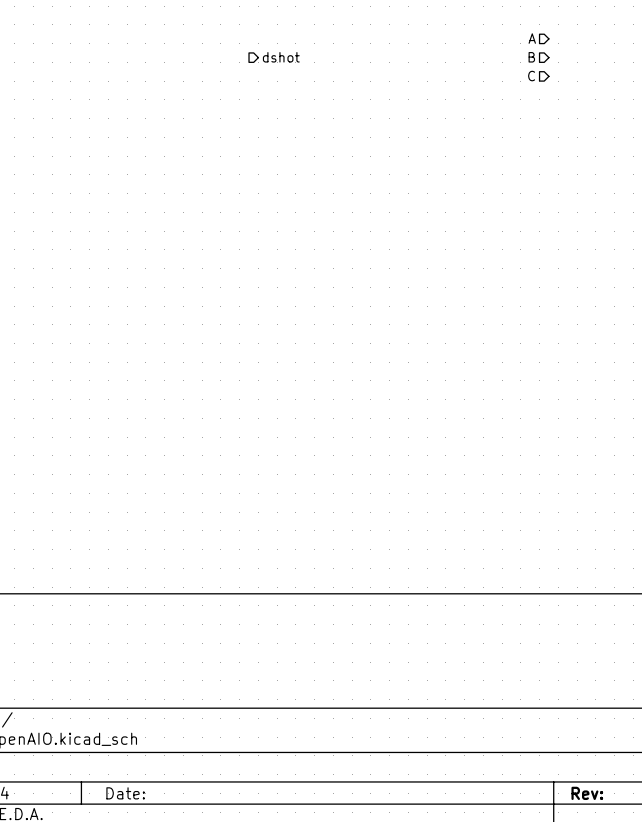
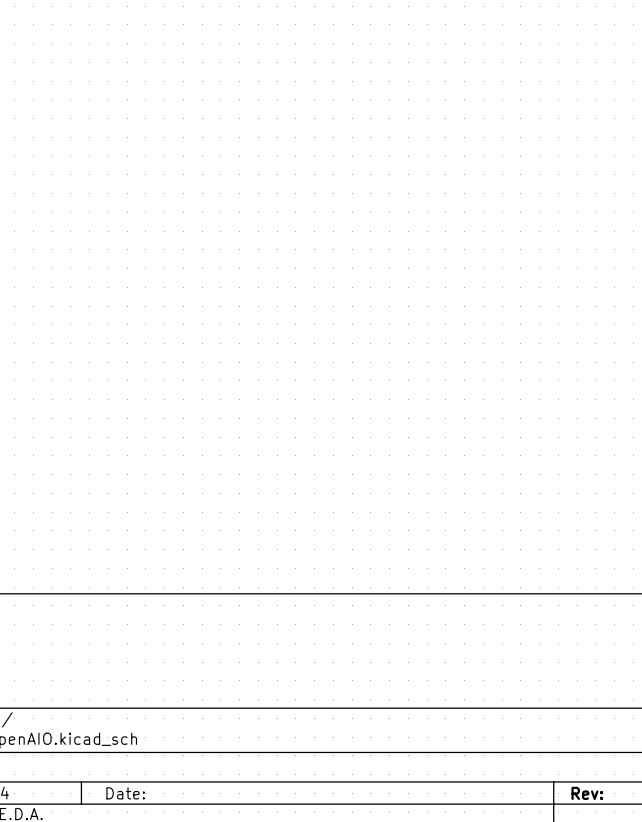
sheet pin: A (532, 38) -> none
sheet pin: dshot (281, 57) -> none
sheet pin: B (531, 57) -> none
sheet pin: C (531, 76) -> none

